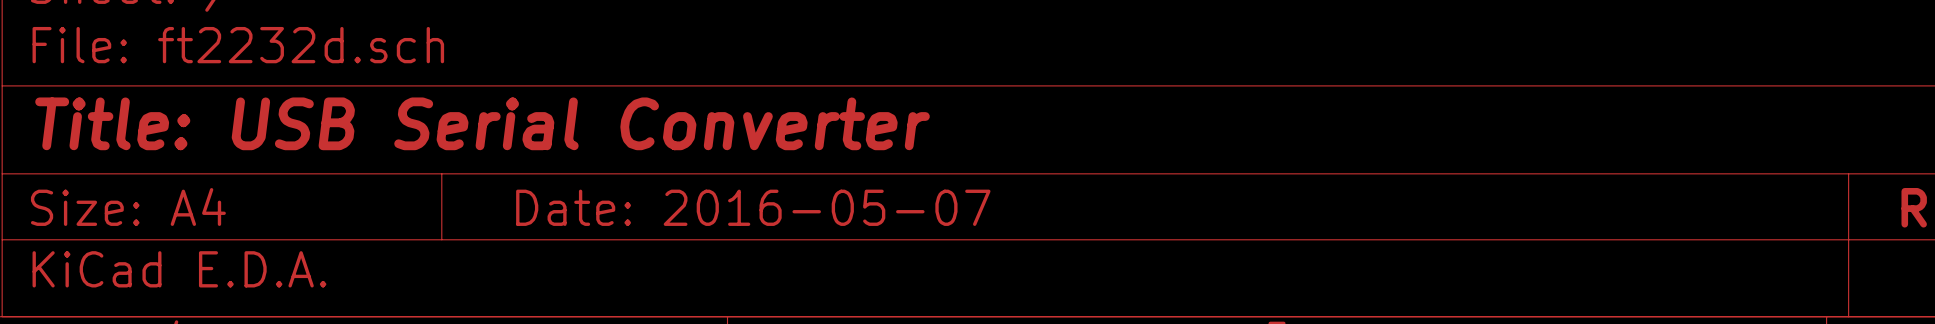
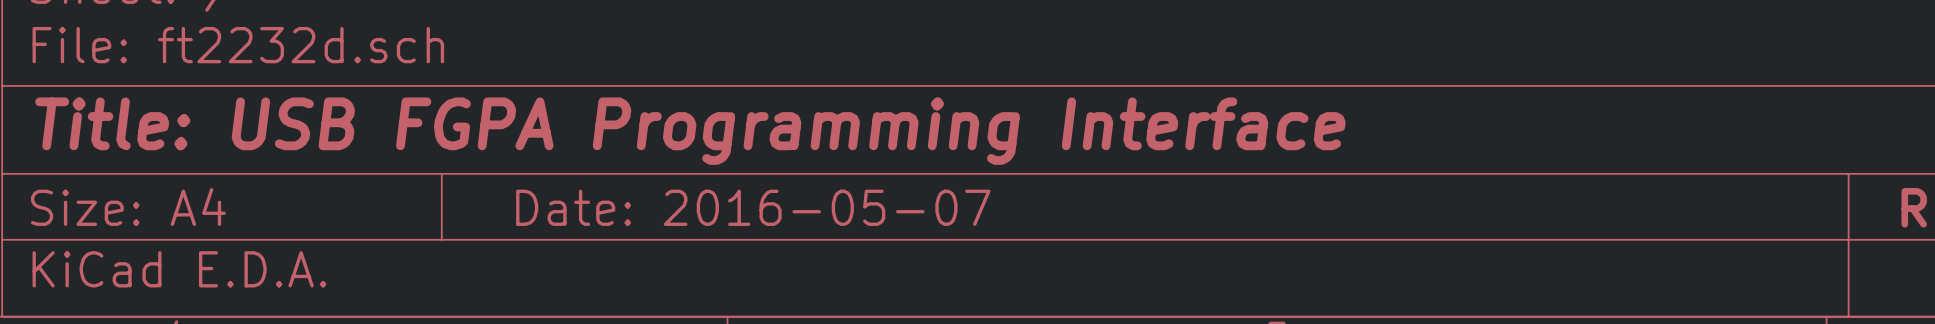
title block: Title: USB Serial Converter (482, 123) -> Title: USB FGPA Programming Interface (690, 131)

